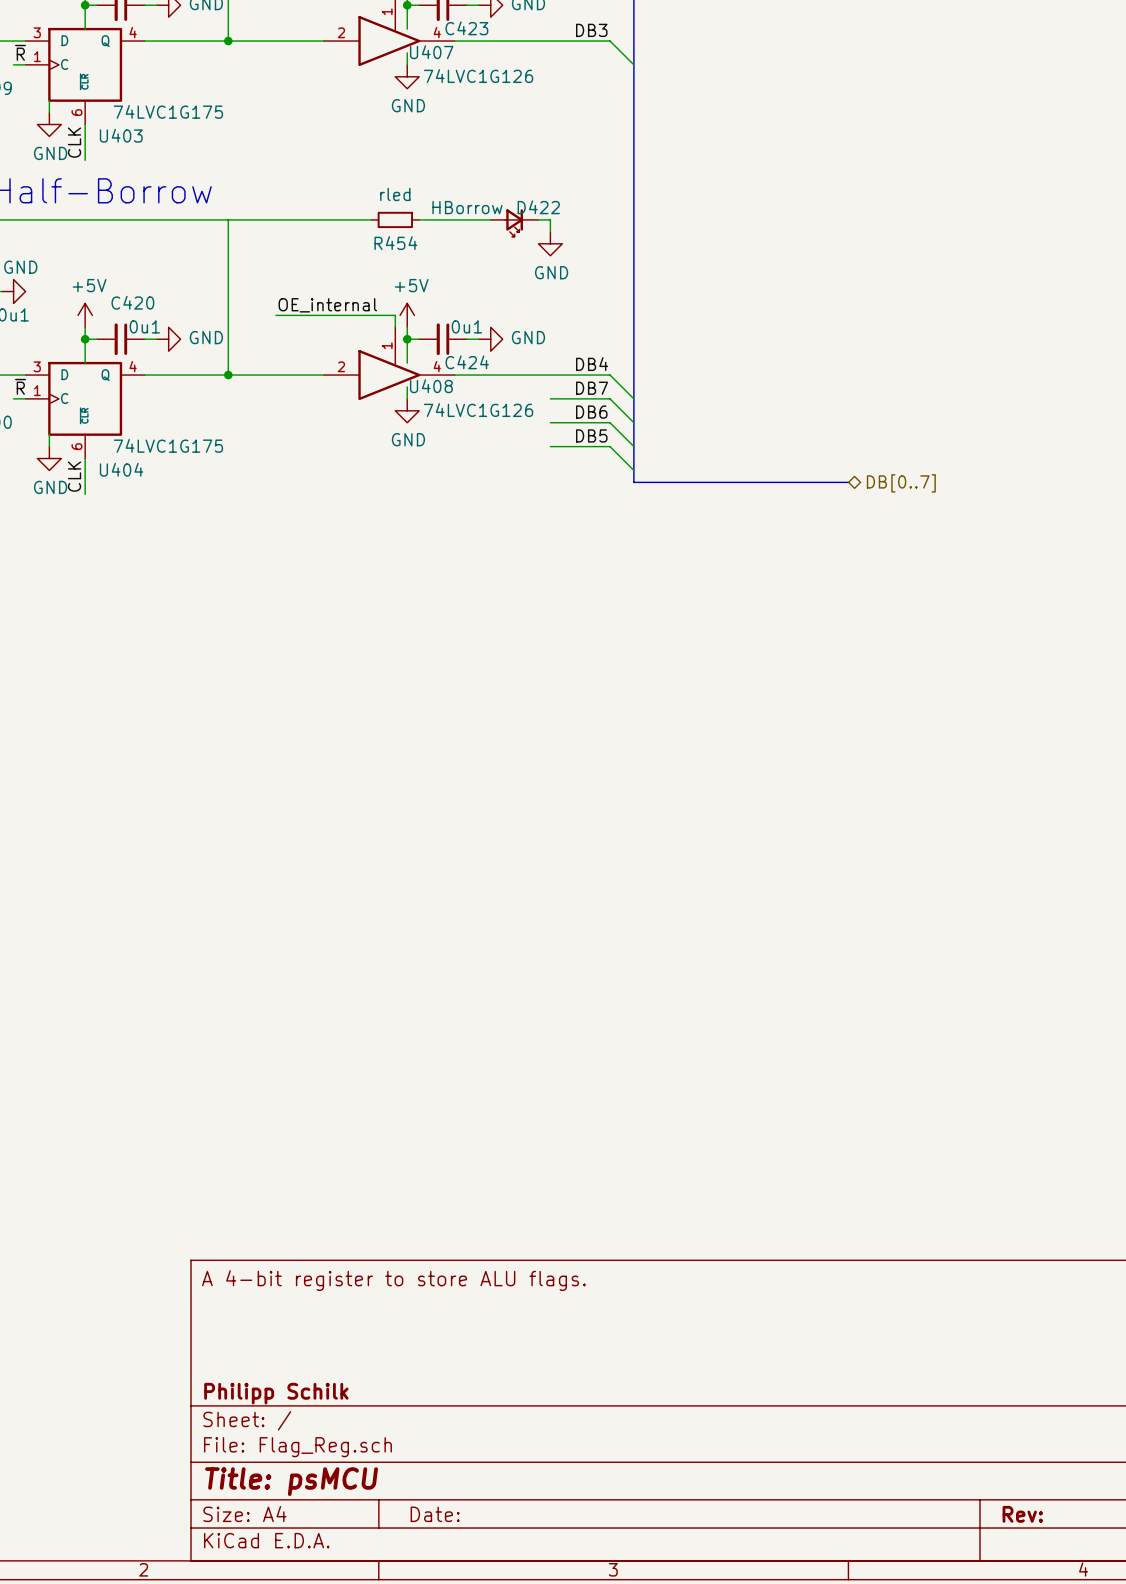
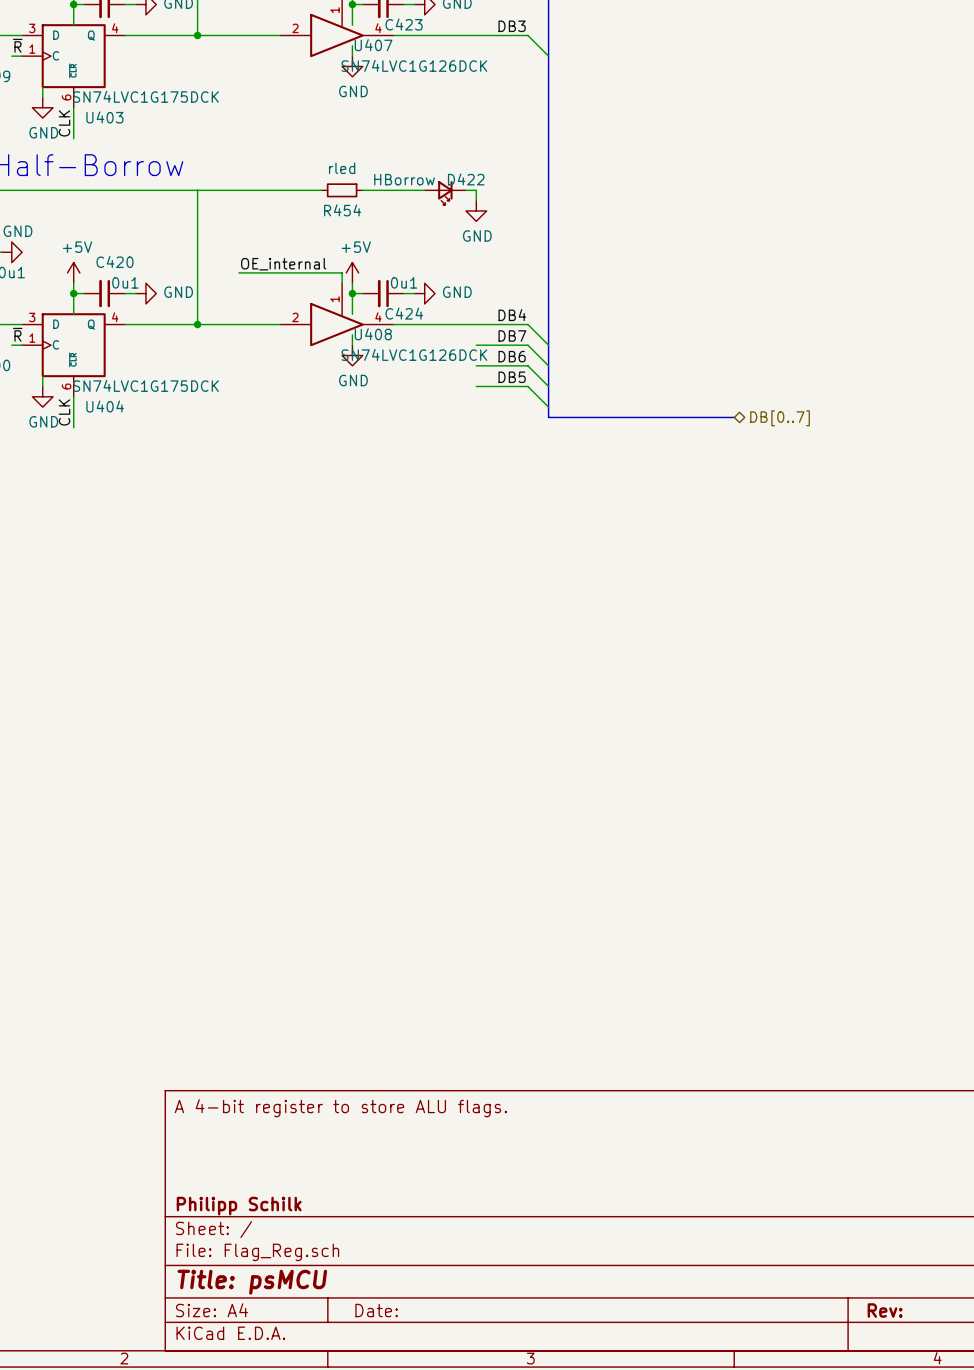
U407 value: 74LVC1G126 (478, 76) -> SN74LVC1G126DCK (414, 65)
U403 value: 74LVC1G175 (168, 111) -> SN74LVC1G175DCK (145, 96)
U408 value: 74LVC1G126 (478, 410) -> SN74LVC1G126DCK (414, 354)
U404 value: 74LVC1G175 (168, 445) -> SN74LVC1G175DCK (145, 385)

